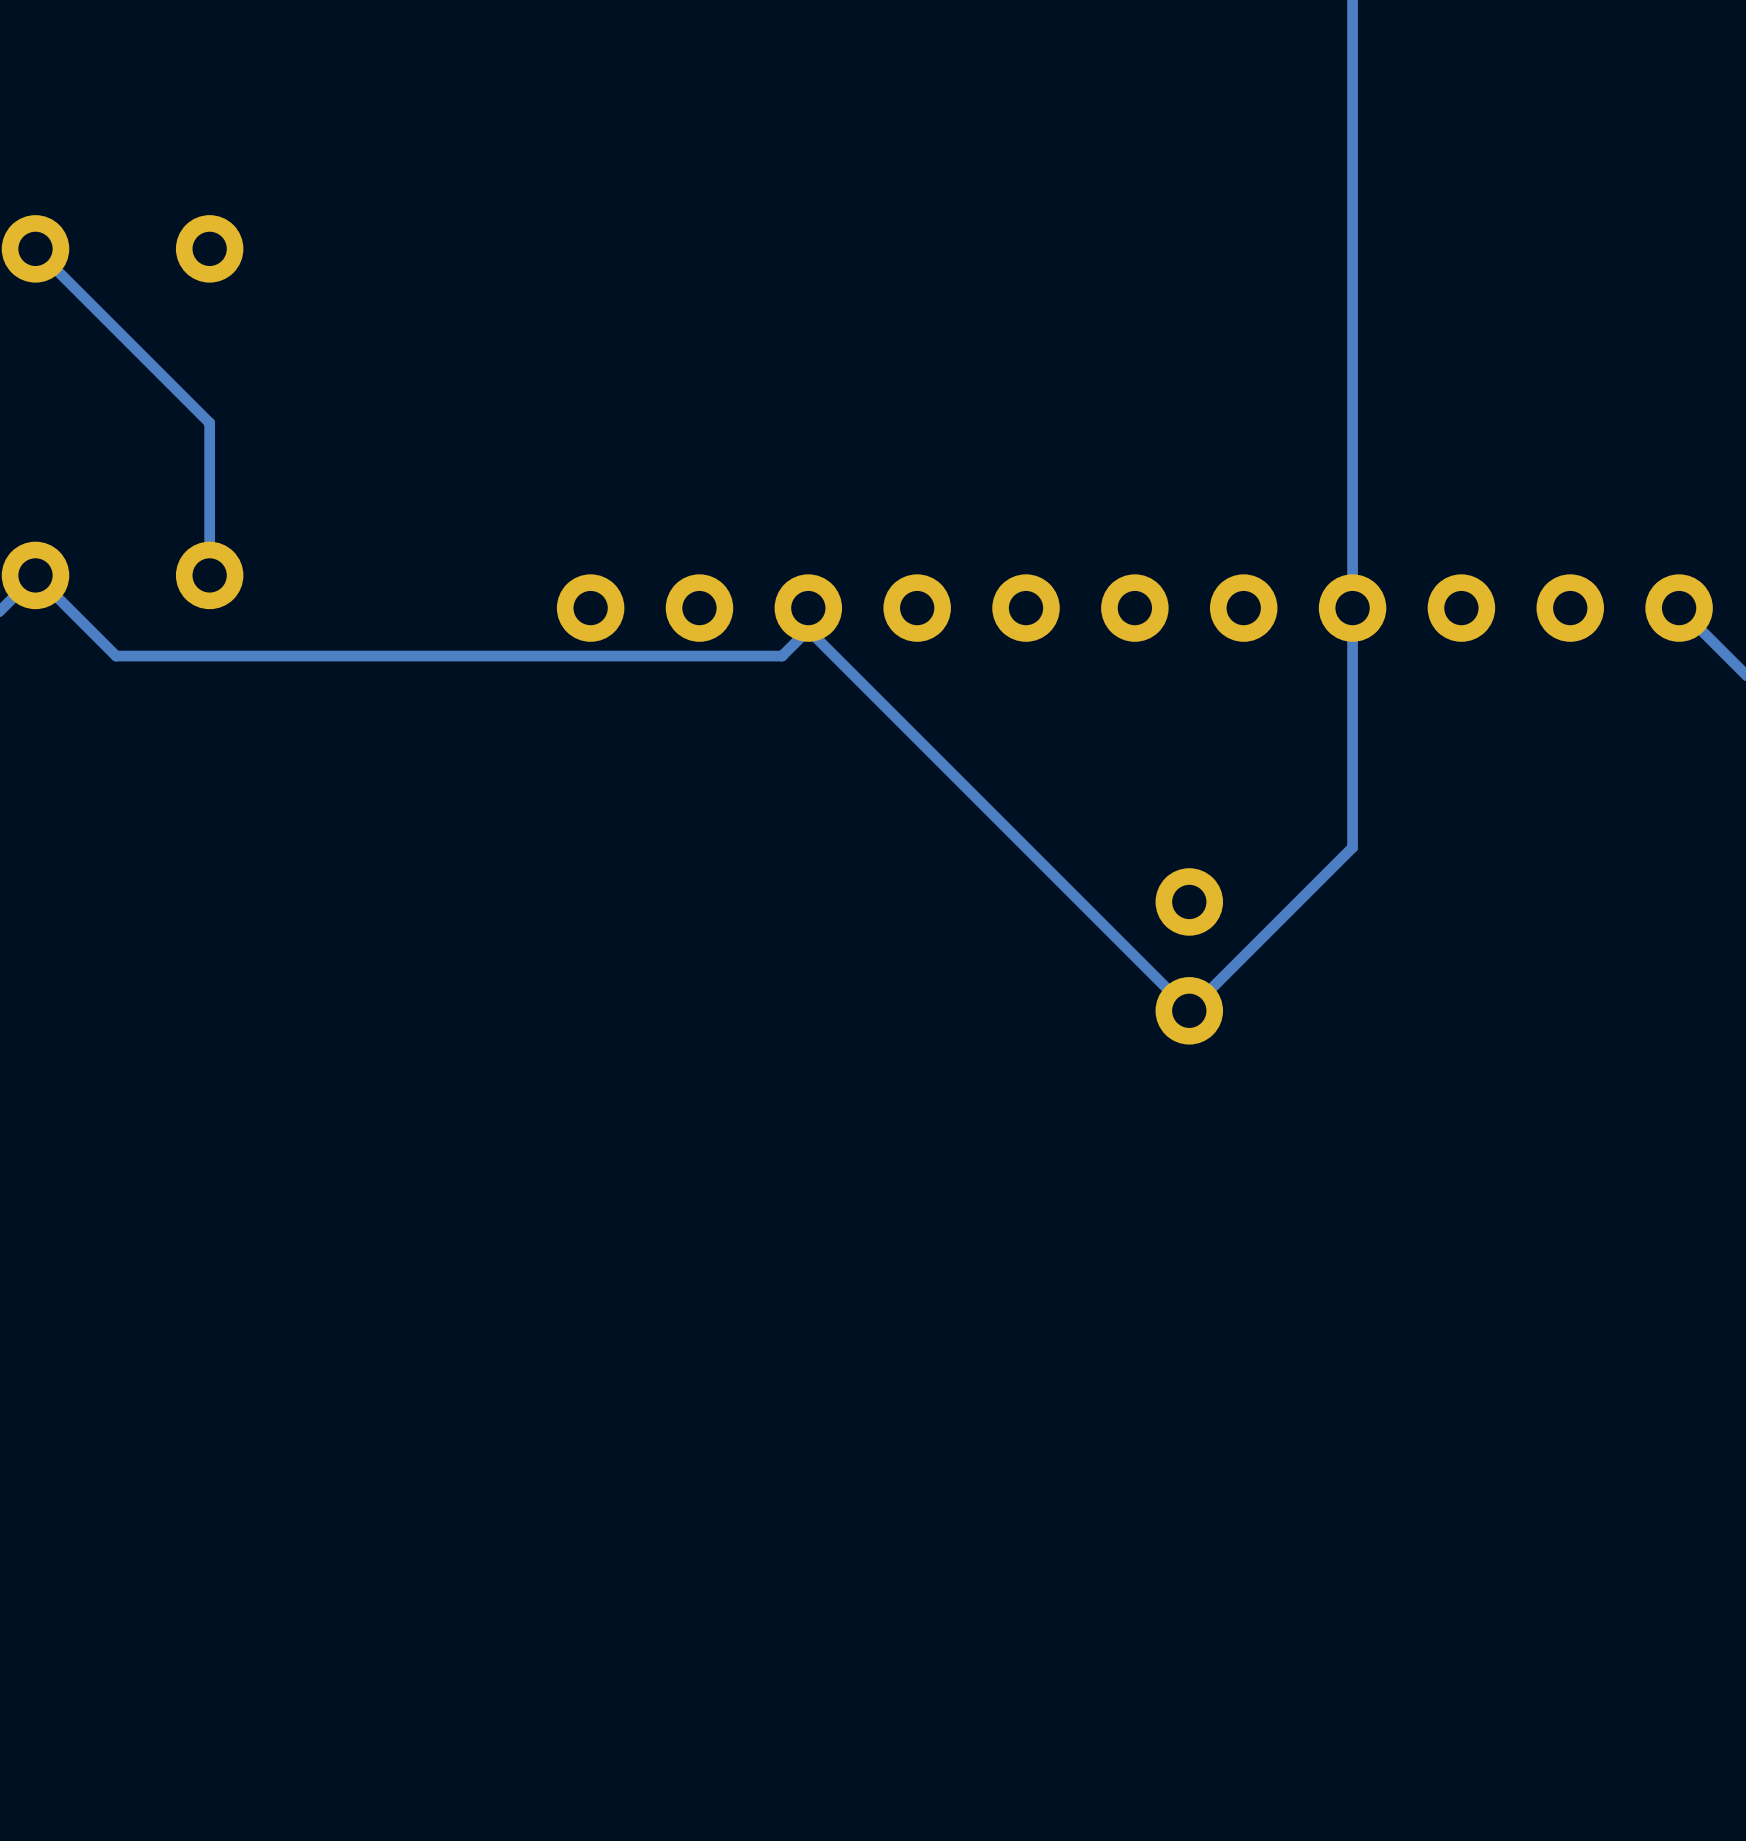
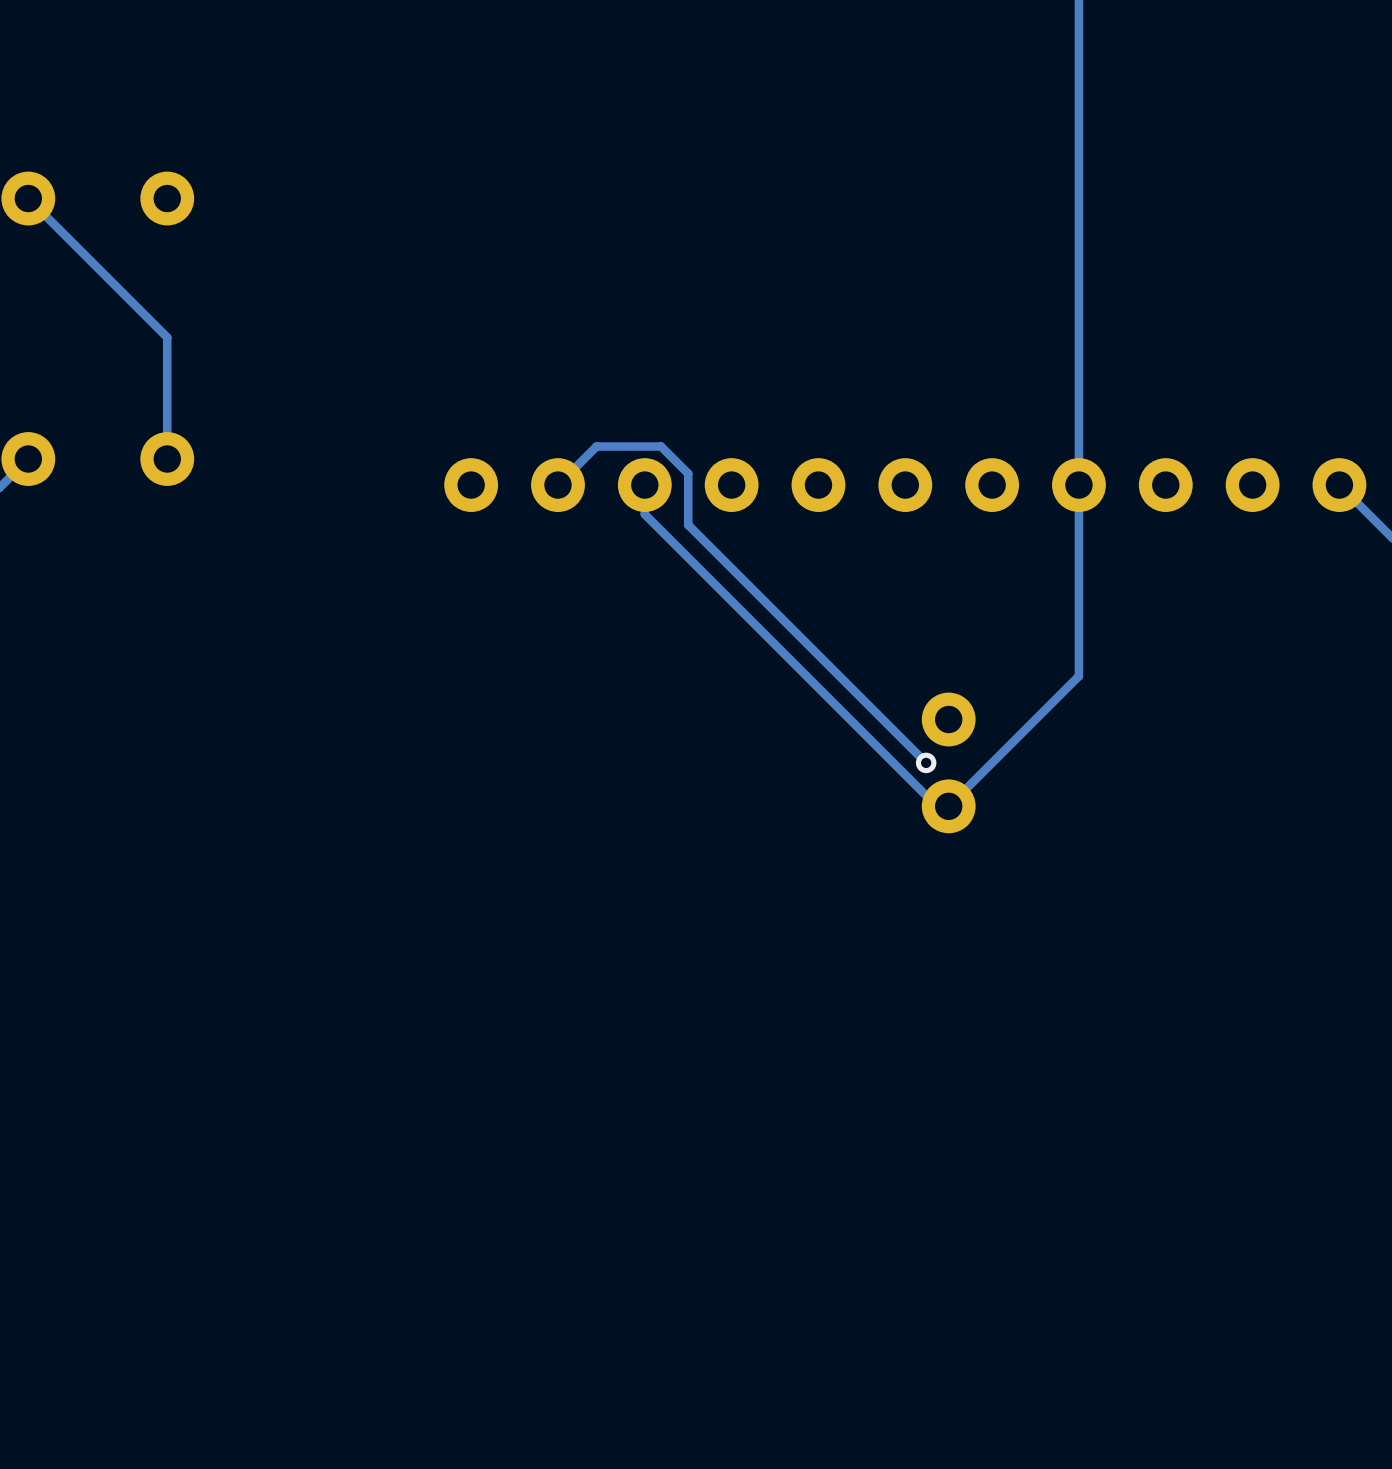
track: (35, 575) (116, 656) (782, 656) (808, 629) (1189, 1010) -> (644, 502) (644, 514) (936, 806) (948, 806)
track: none -> (557, 485) (596, 446) (661, 446) (688, 473) (688, 524) (926, 762)
via: none -> (926, 762)

